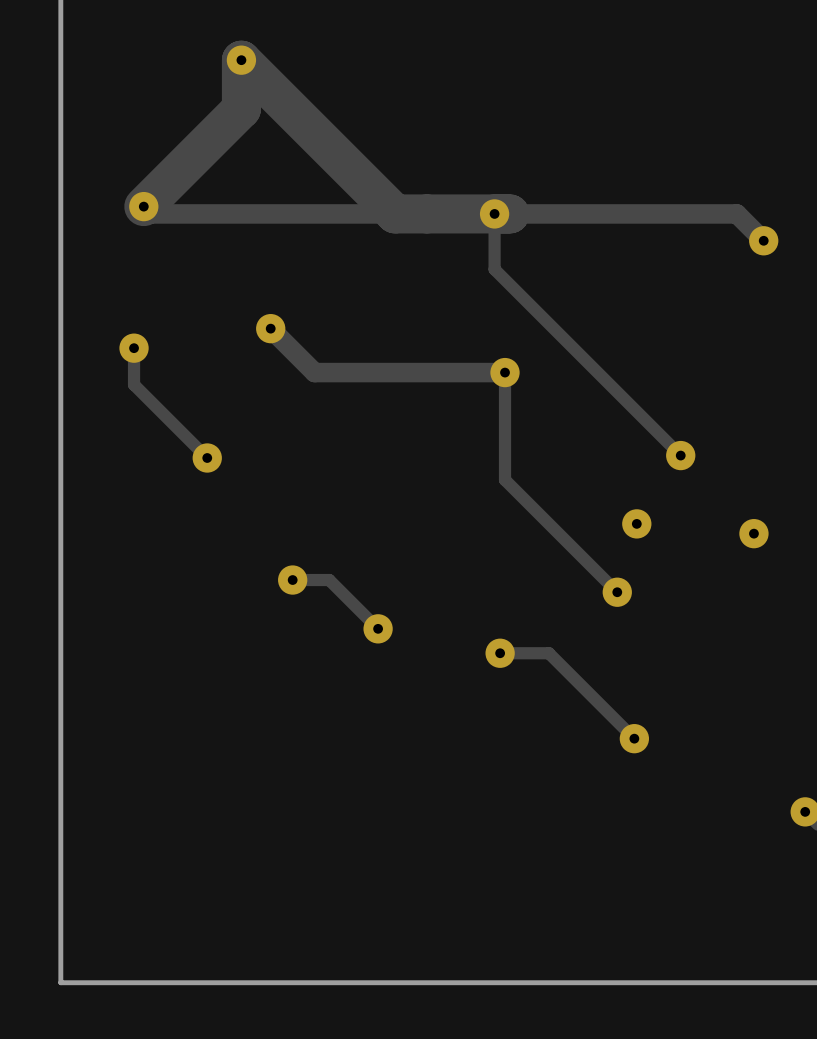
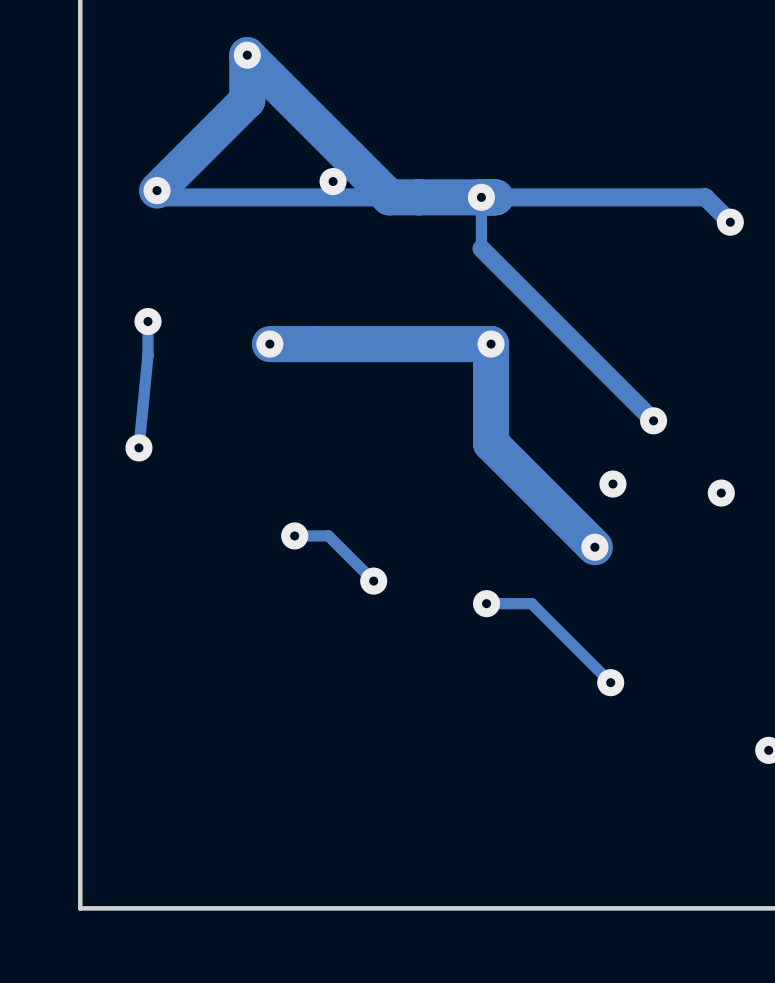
via: none -> (333, 181)
track width: thin (494, 269) (680, 455) -> thick (481, 248) (653, 420)
track: (270, 328) (314, 372) -> (269, 344) (315, 344)
via position: (270, 328) -> (269, 344)
track width: thin (314, 372) (505, 372) (505, 479) (617, 592) -> thick (315, 344) (491, 344) (491, 443) (594, 547)
track: (134, 384) (207, 458) -> (147, 355) (138, 447)
via: (207, 458) -> none
via: none -> (138, 447)

